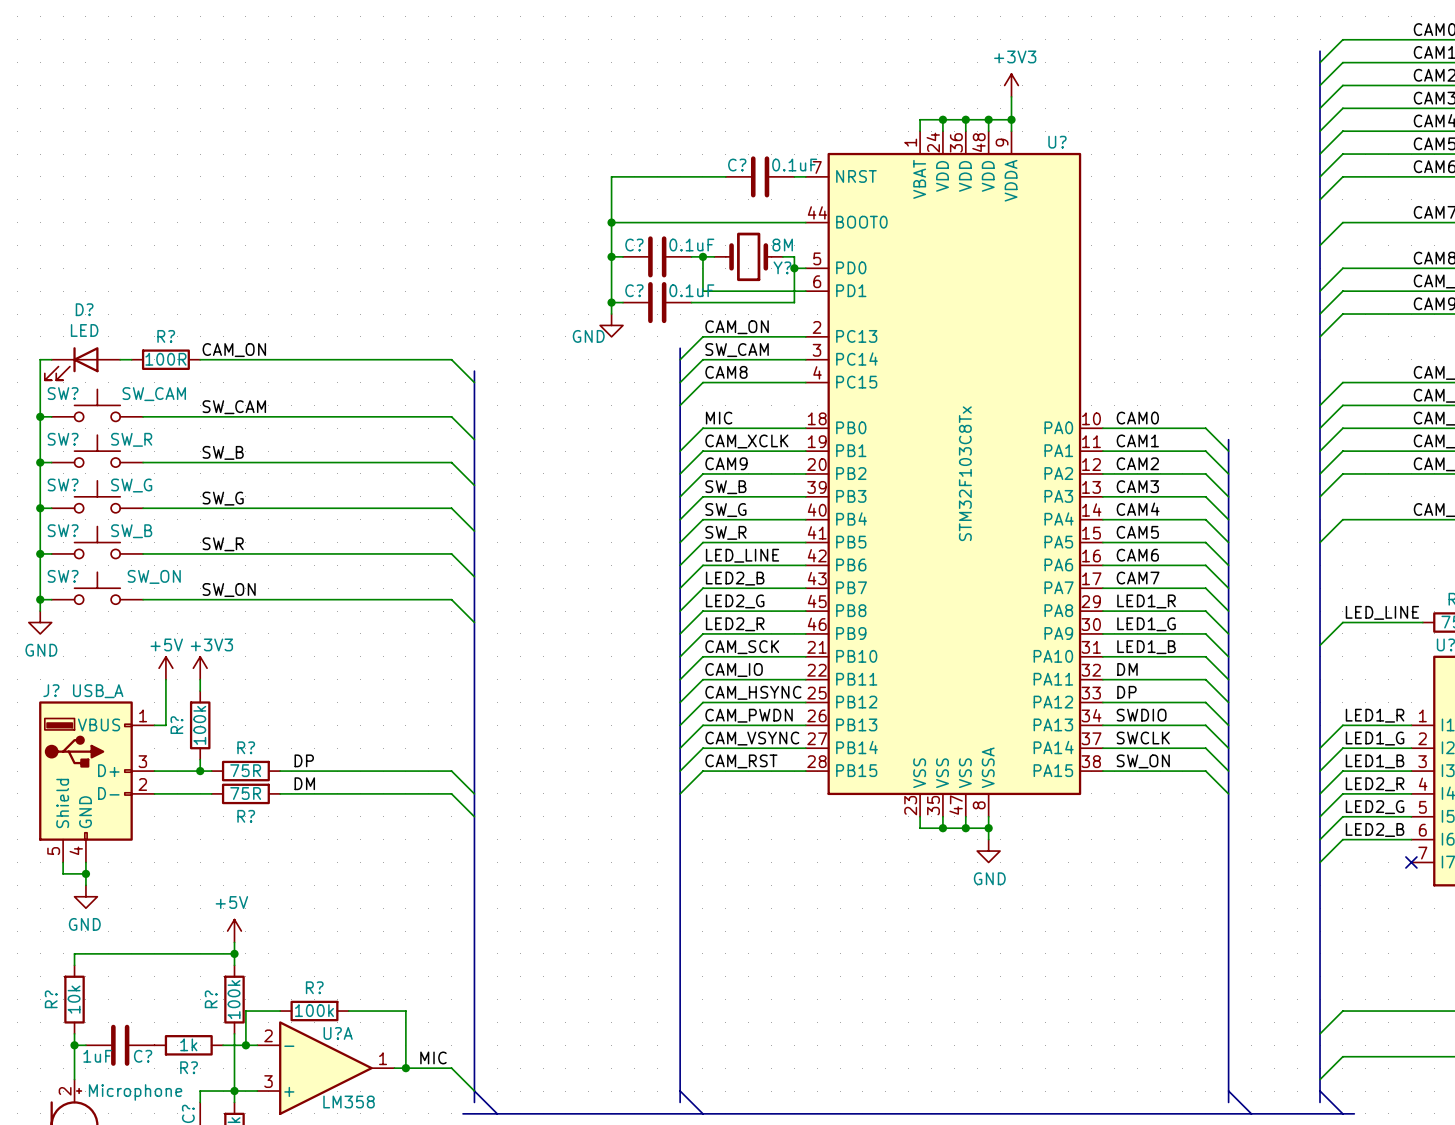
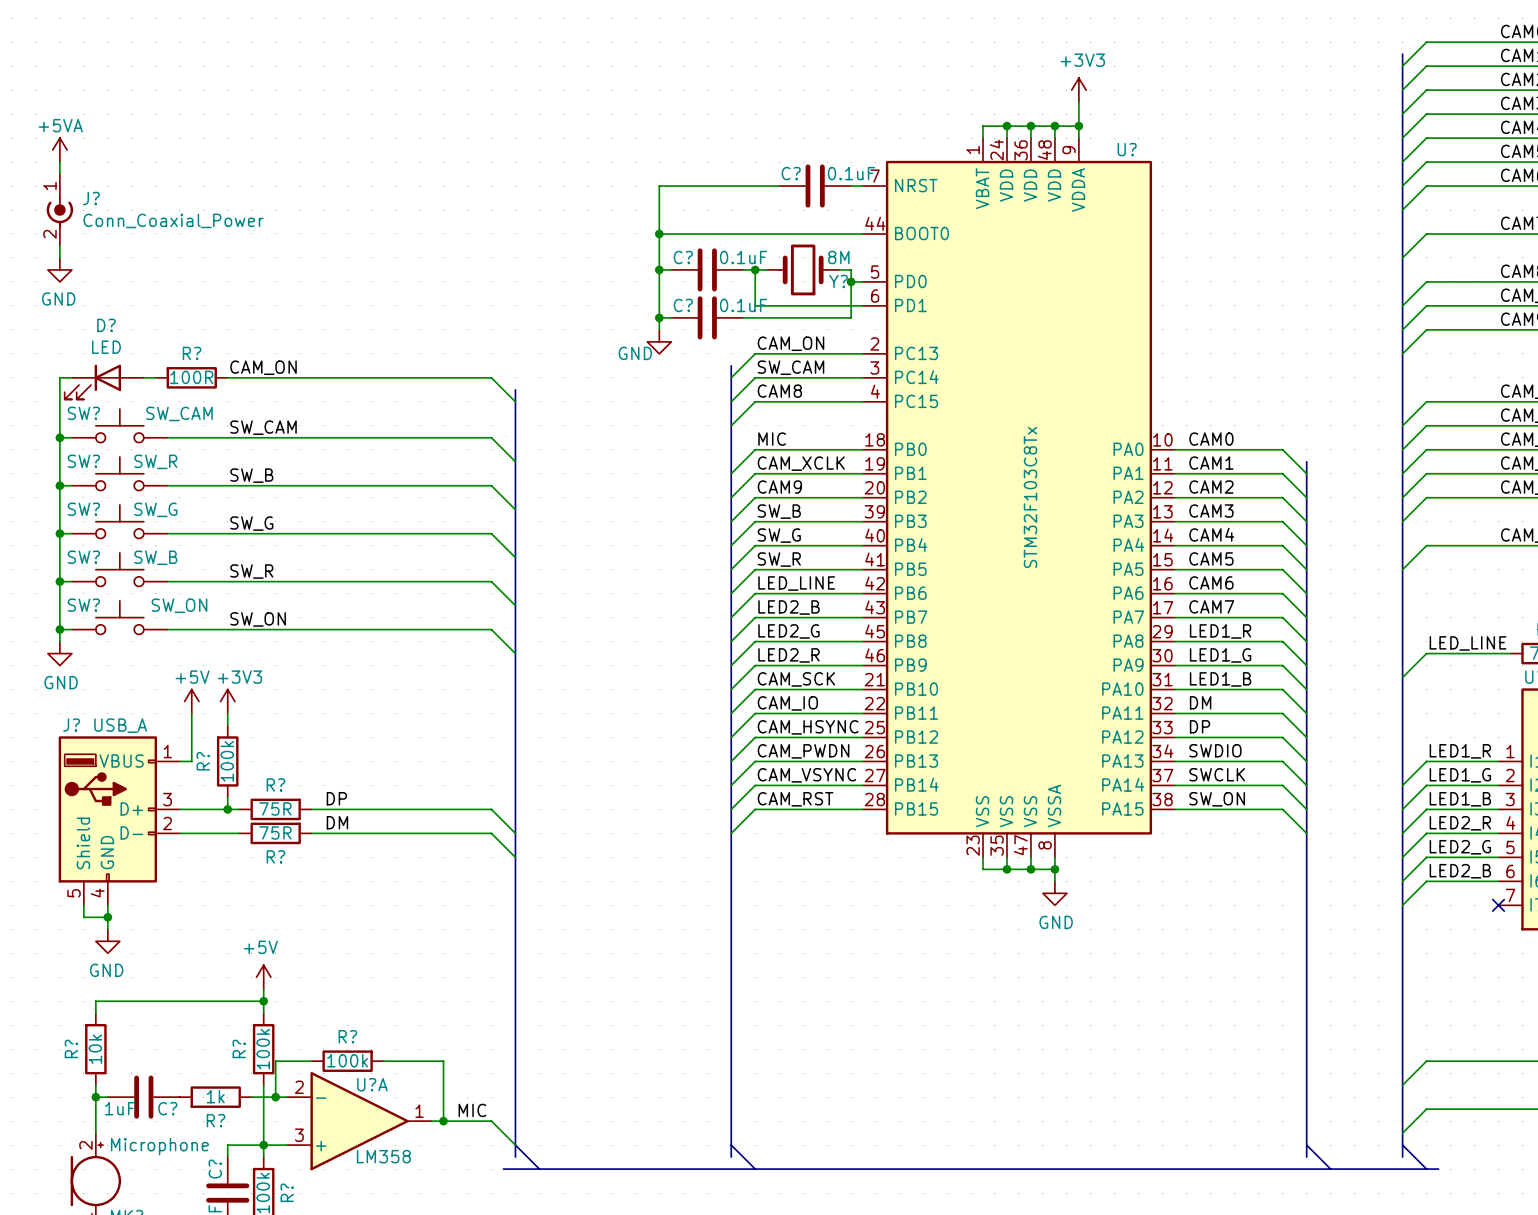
power symbol: none -> +5VA (59, 150)
wire: none -> (59, 162) (59, 174)
J?: none -> Conn_Coaxial_Power (59, 210)
wire: none -> (59, 245) (59, 257)
power symbol: none -> GND (59, 269)

